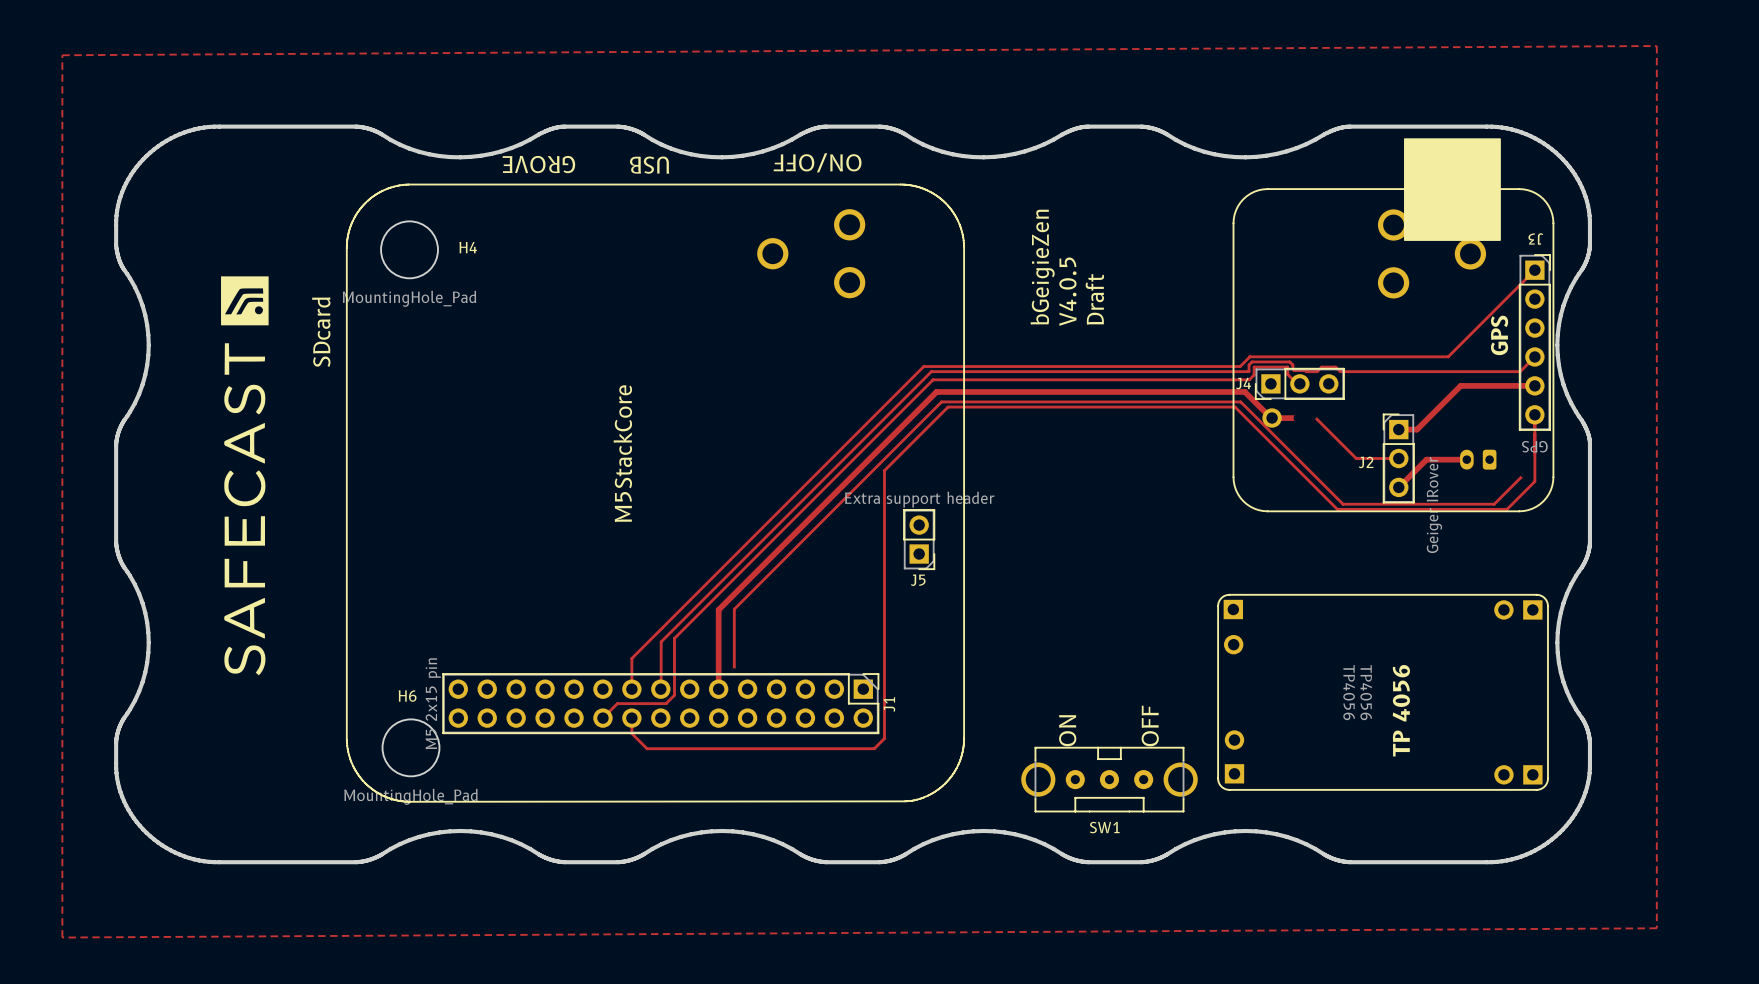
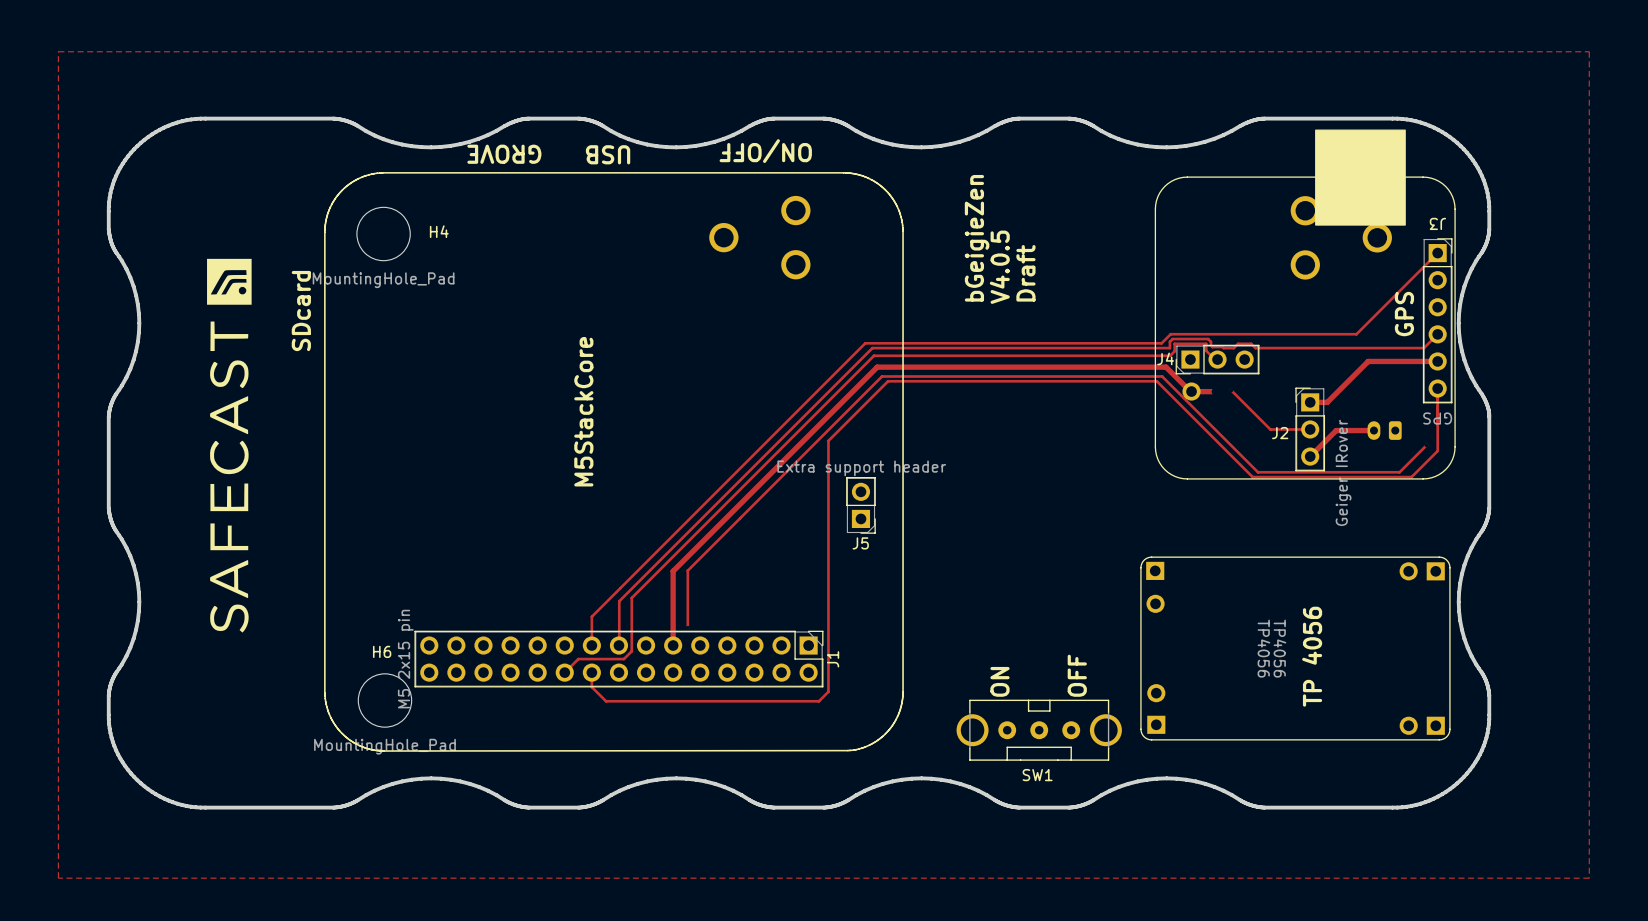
zone outline: (62, 55) (1656, 46) (1656, 928) (62, 937) -> (58, 51) (1589, 51) (1589, 878) (58, 878)

